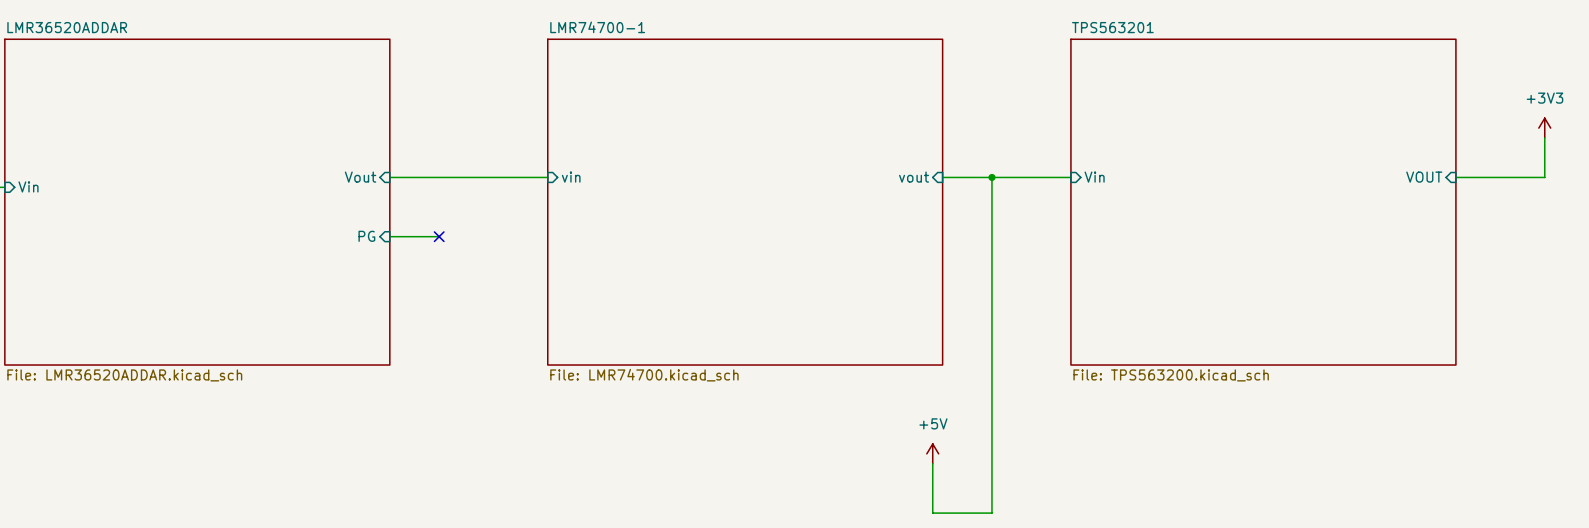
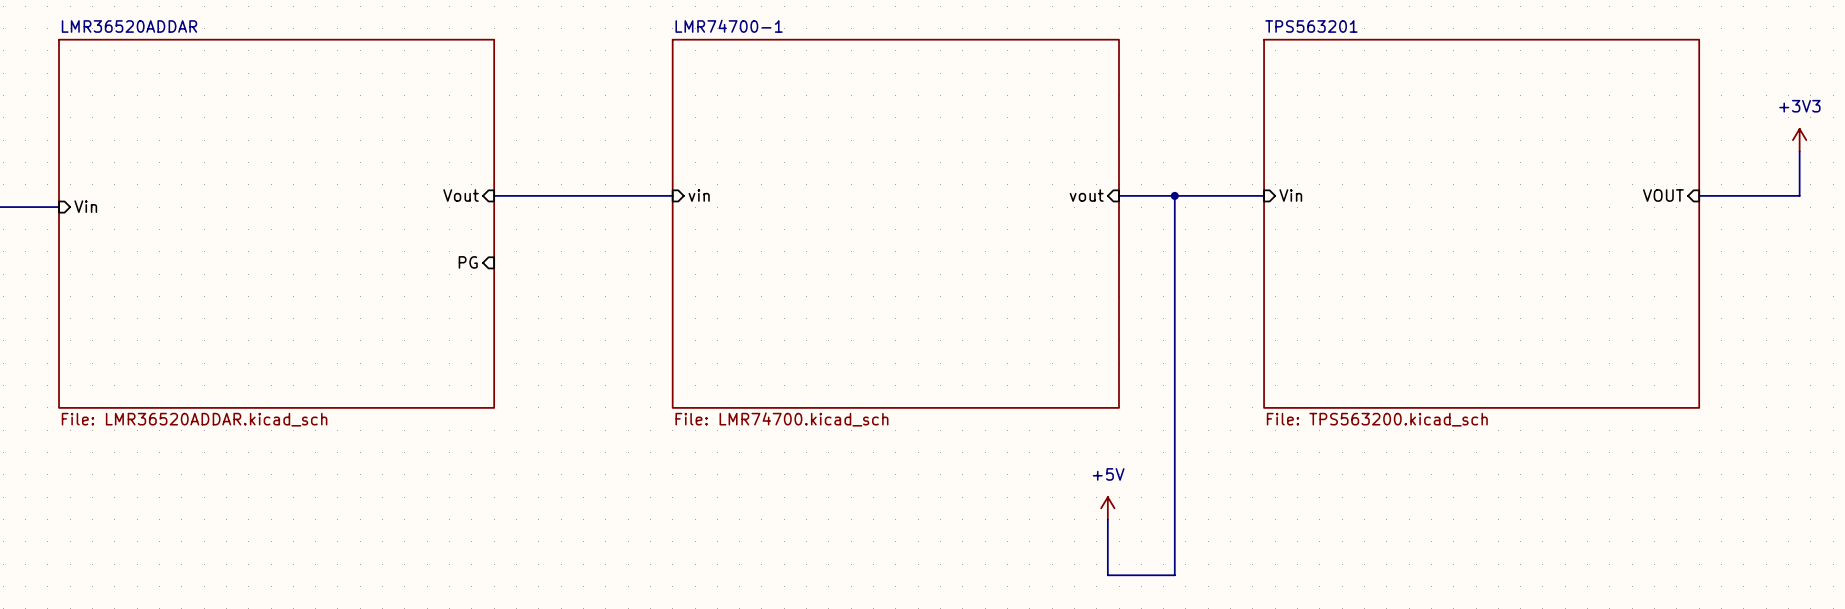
wire: (389, 236) (439, 236) -> none
no-connect mark: (439, 236) -> none

